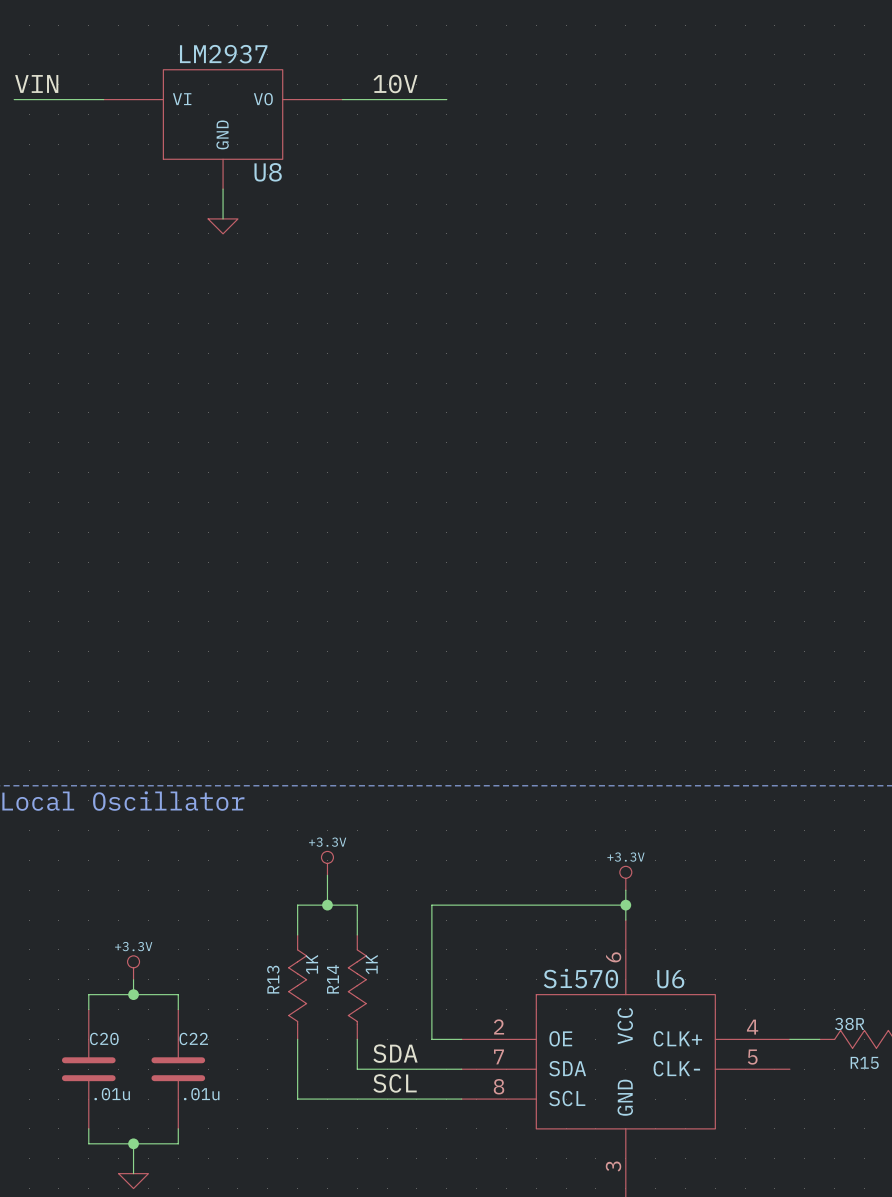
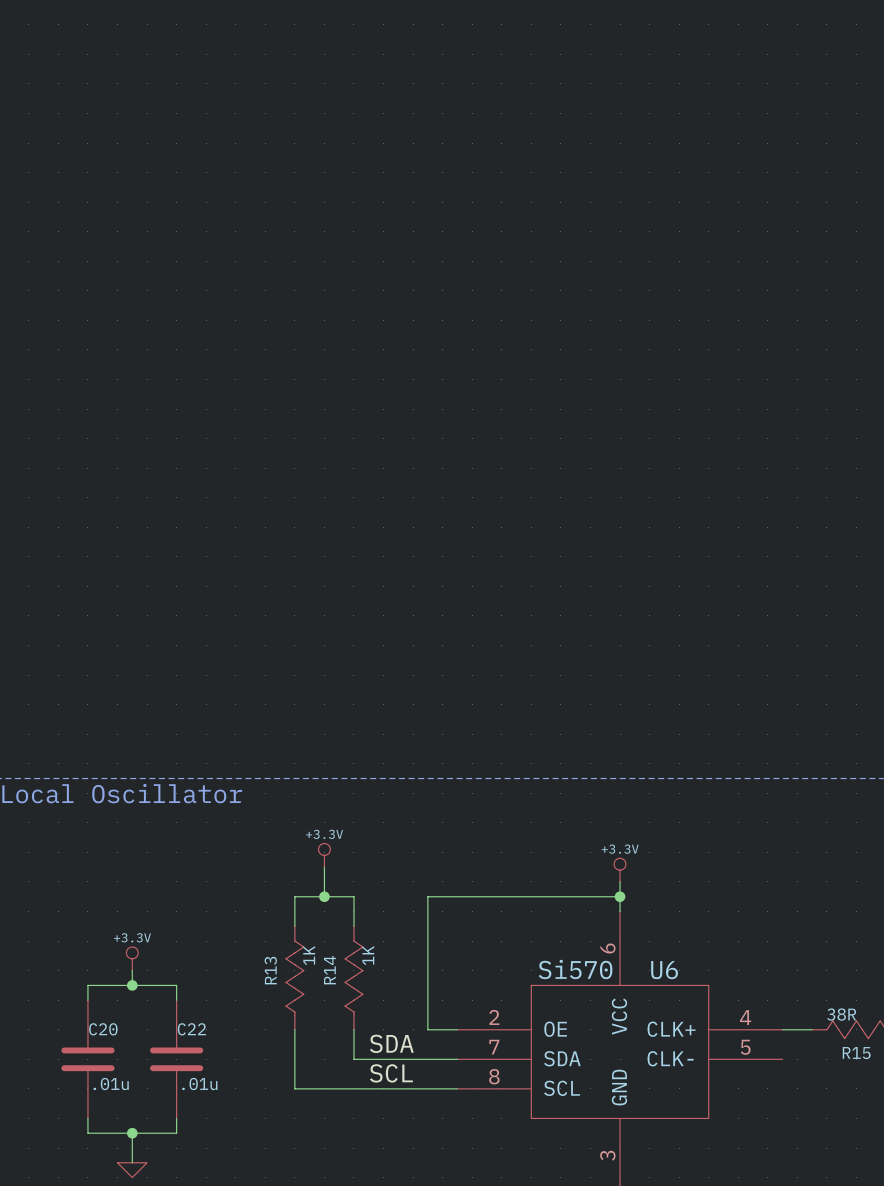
label: VIN (36, 83) -> none
label: 10V (395, 83) -> none
wire: (14, 99) (103, 99) -> none
wire: (342, 99) (446, 99) -> none
U8: LM2937 (223, 129) -> none
wire: (223, 189) (223, 218) -> none
power symbol: (223, 226) -> none

